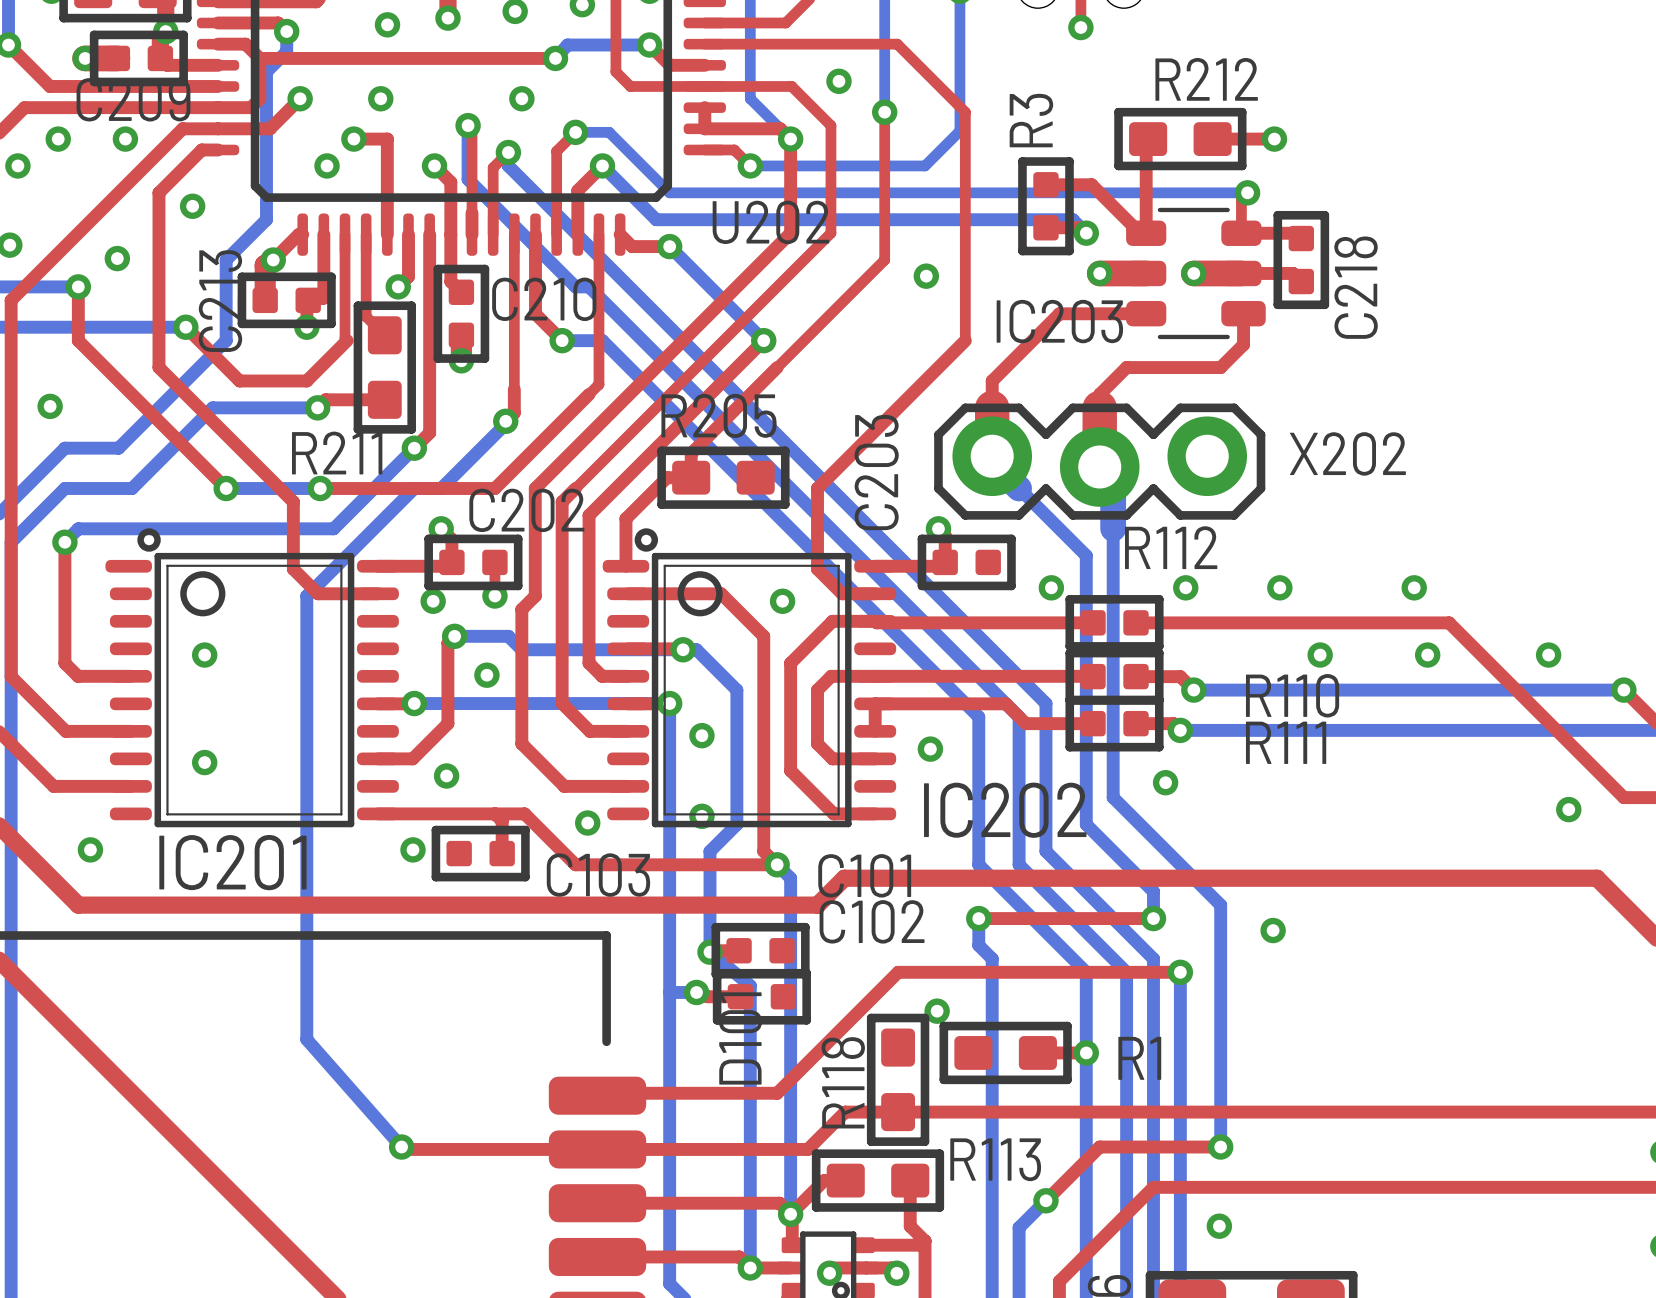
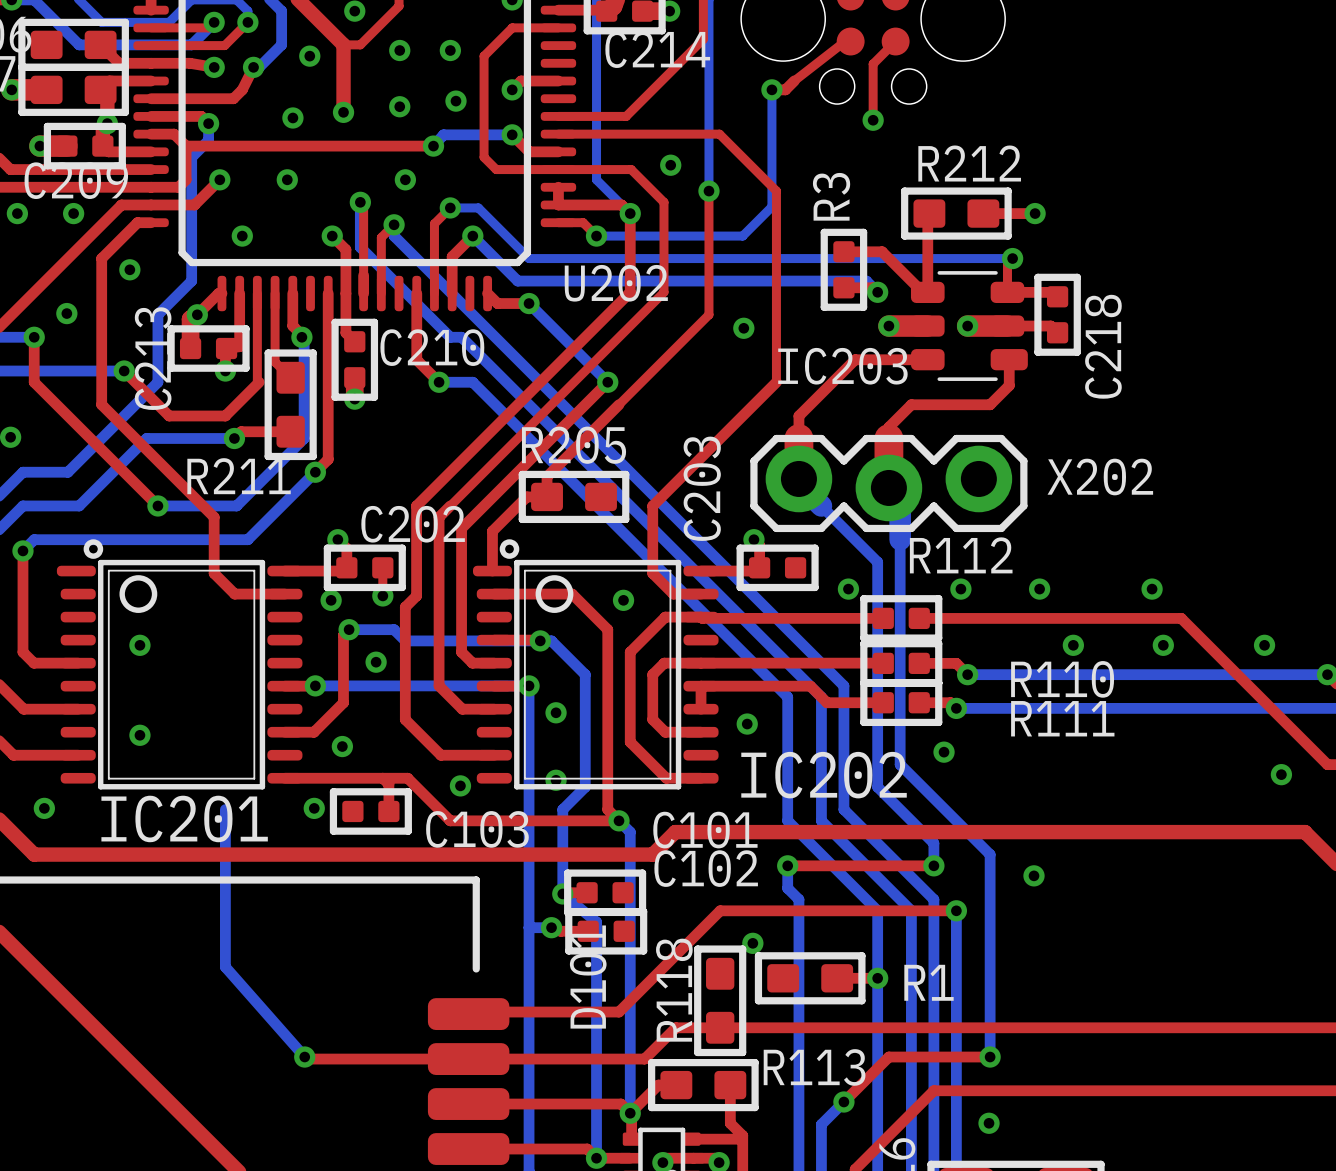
top track: (353, 139) (387, 139) (387, 234) -> (304, 337) (292, 325) (292, 293)
via: (353, 139) -> none
top track: (408, 234) (408, 276) (398, 286) -> none
top track: (514, 234) (514, 412) (505, 421) (508, 421) -> none
top track: (598, 234) (598, 384) (494, 488) (320, 488) -> none
bottom track: none -> (304, 337) (304, 438) (236, 505)
bottom track: (505, 421) (508, 421) (441, 488) (414, 488) (306, 596) (306, 851) -> none
via: (505, 421) -> none
via: (320, 488) -> none

